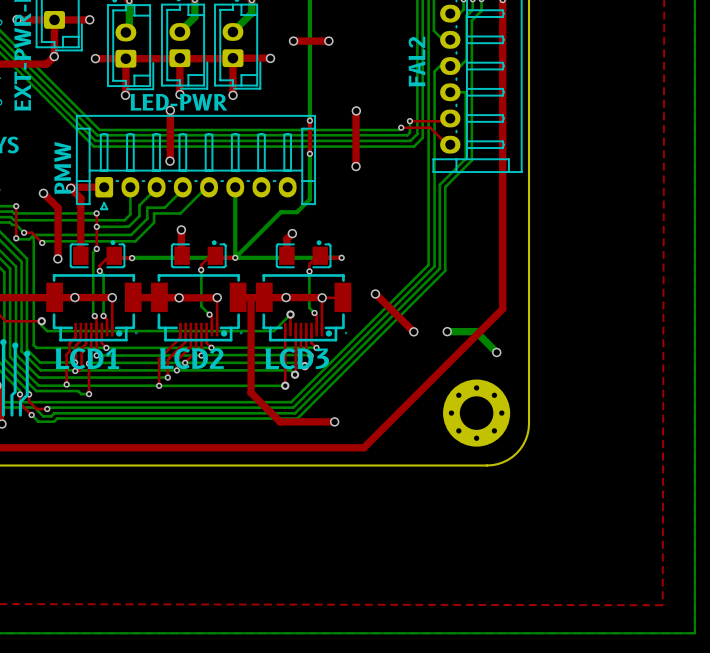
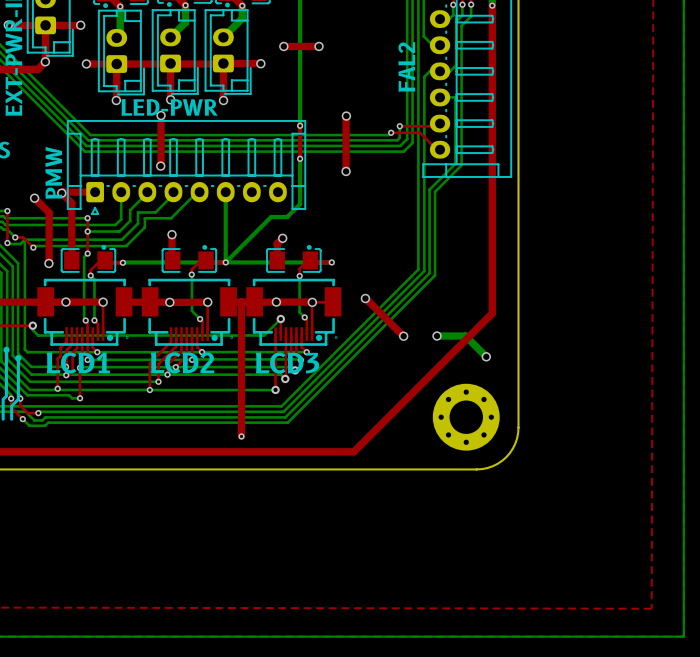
top track: (251, 392) (280, 421) (334, 421) -> (241, 397) (241, 436)
via: (334, 421) -> none
via: none -> (241, 436)

